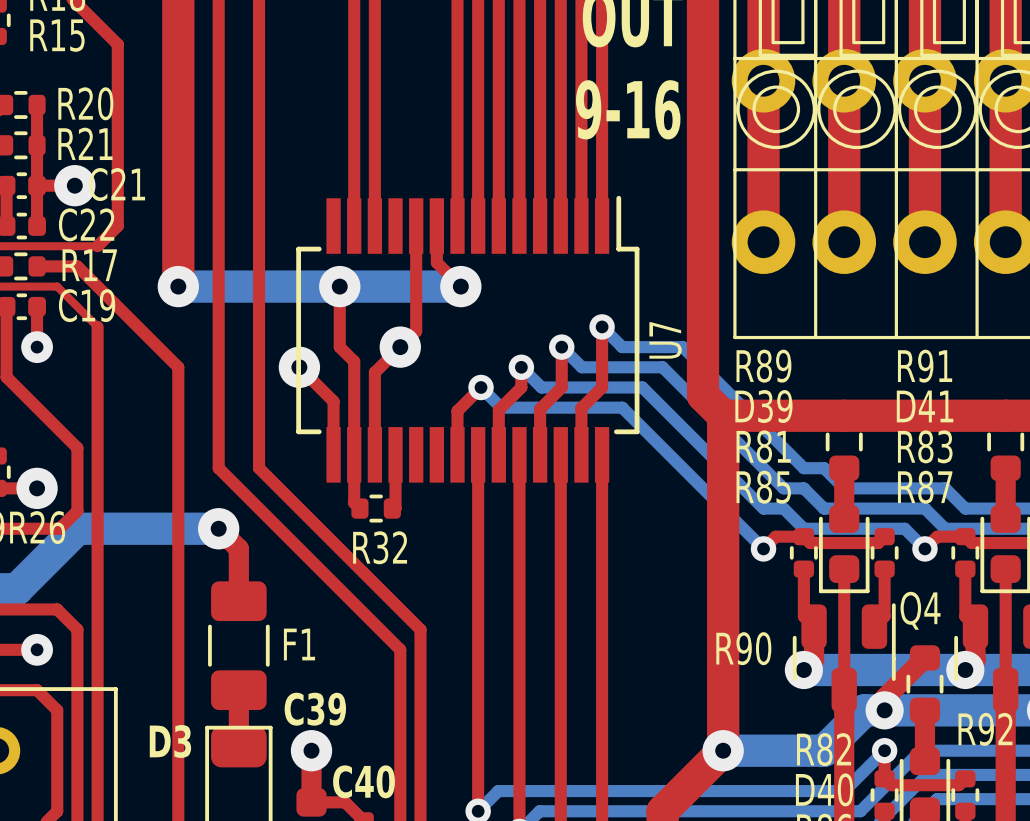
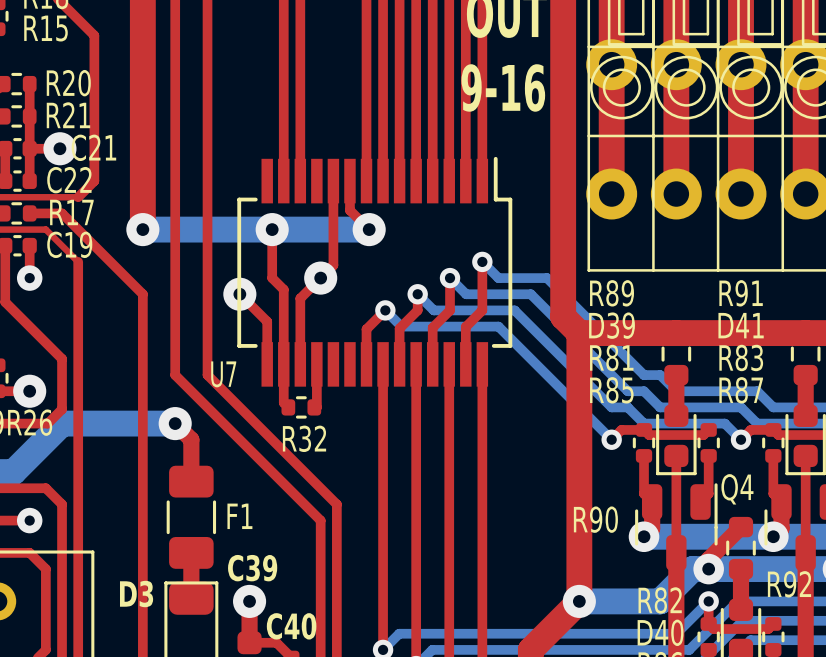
U7 name rotation: 0° (665, 340) -> 90° clockwise (223, 374)
U7 name position: U7 (665, 340) -> U7 (223, 374)

